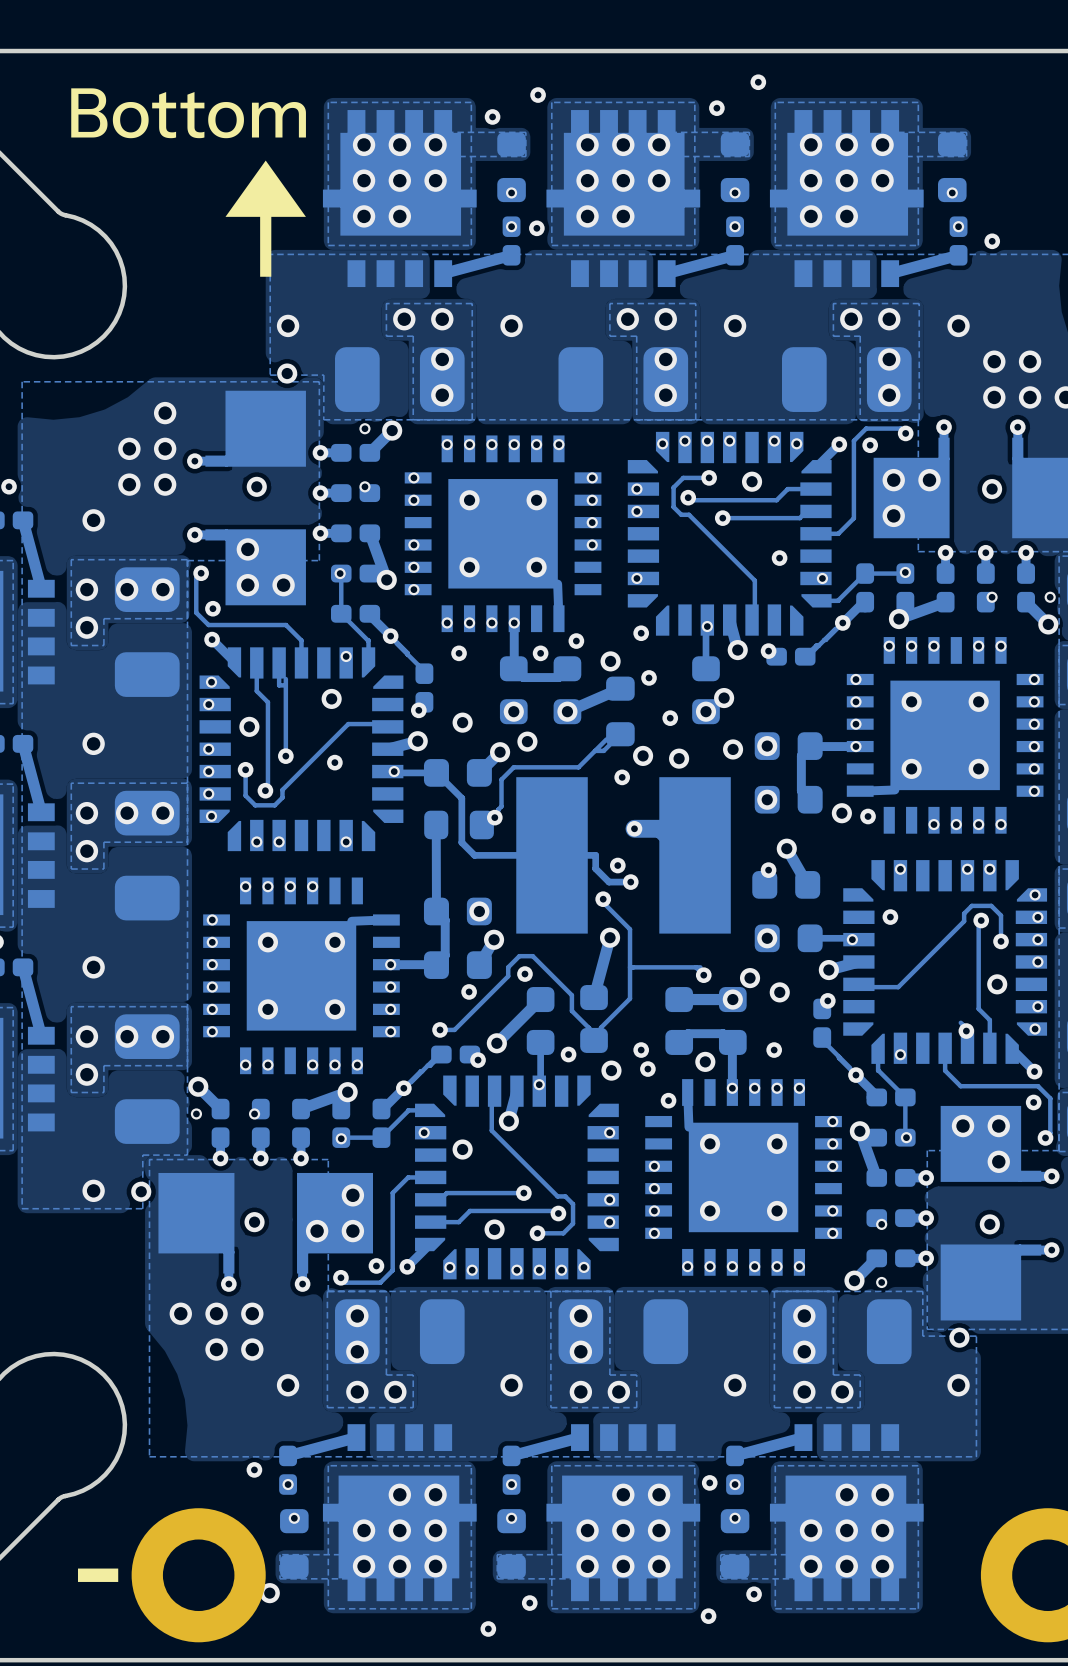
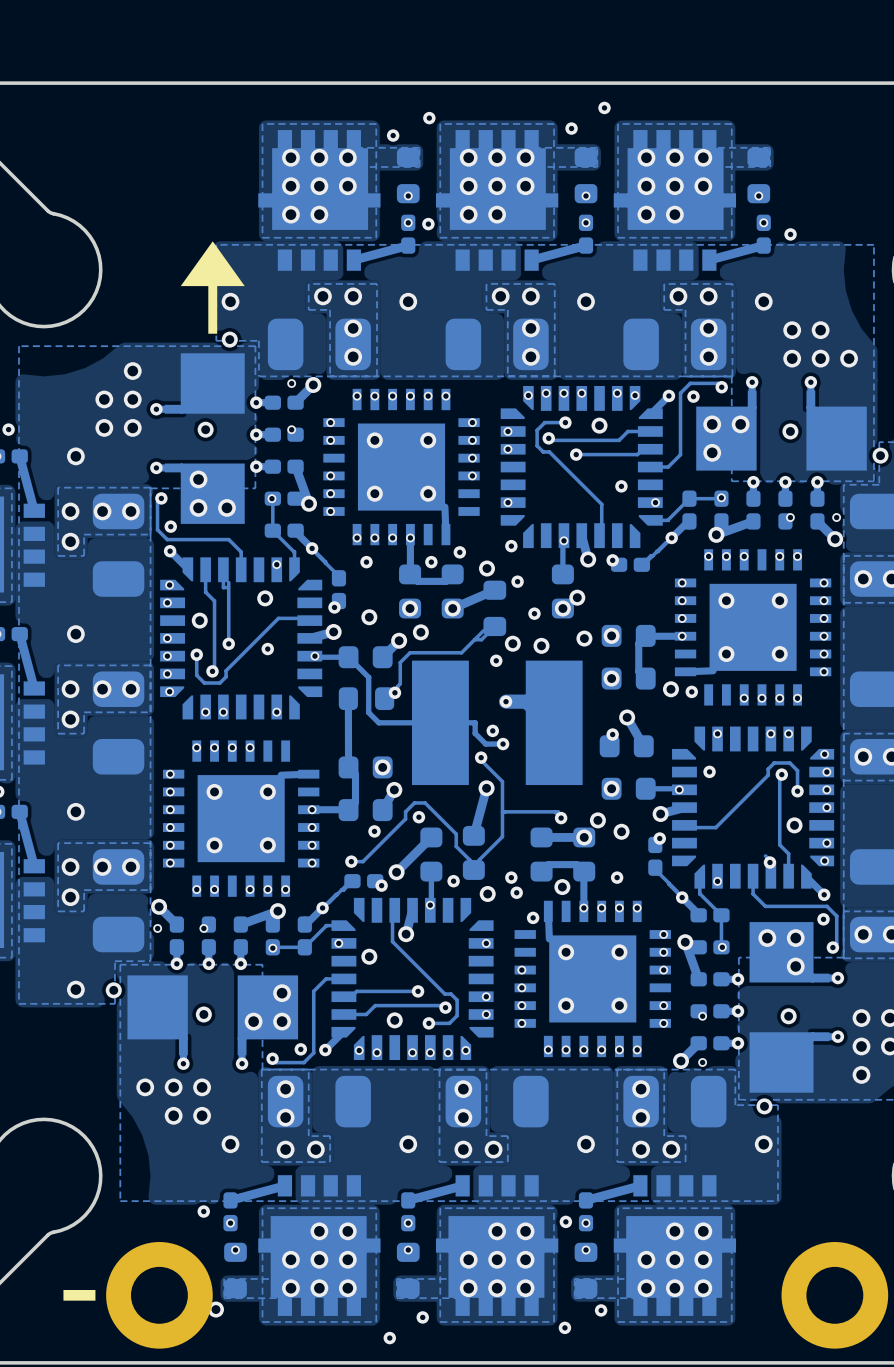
drawing: [71, 88, 306, 139] -> none
drawing position: (265, 218) -> (212, 287)

